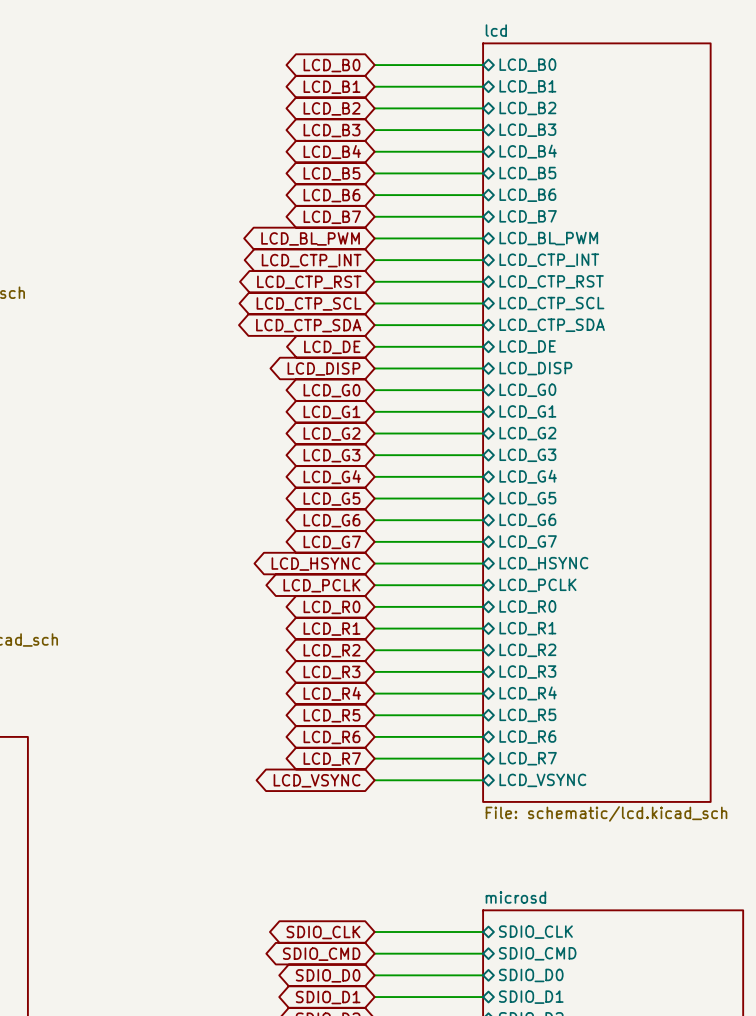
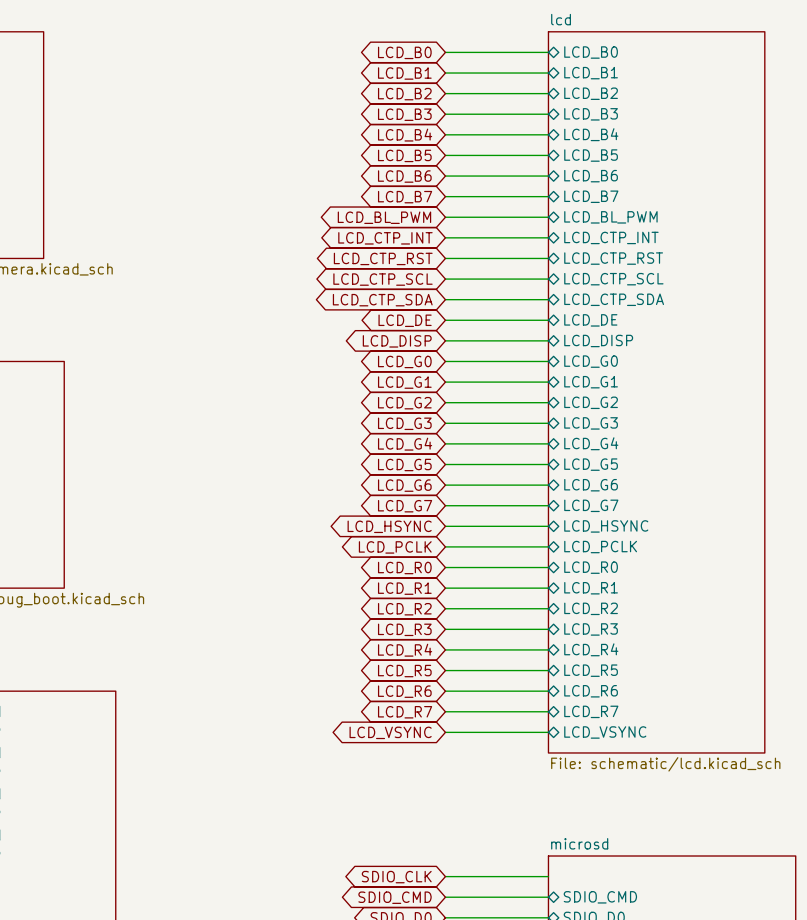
sheet pin: SDIO_CLK (535, 932) -> none

